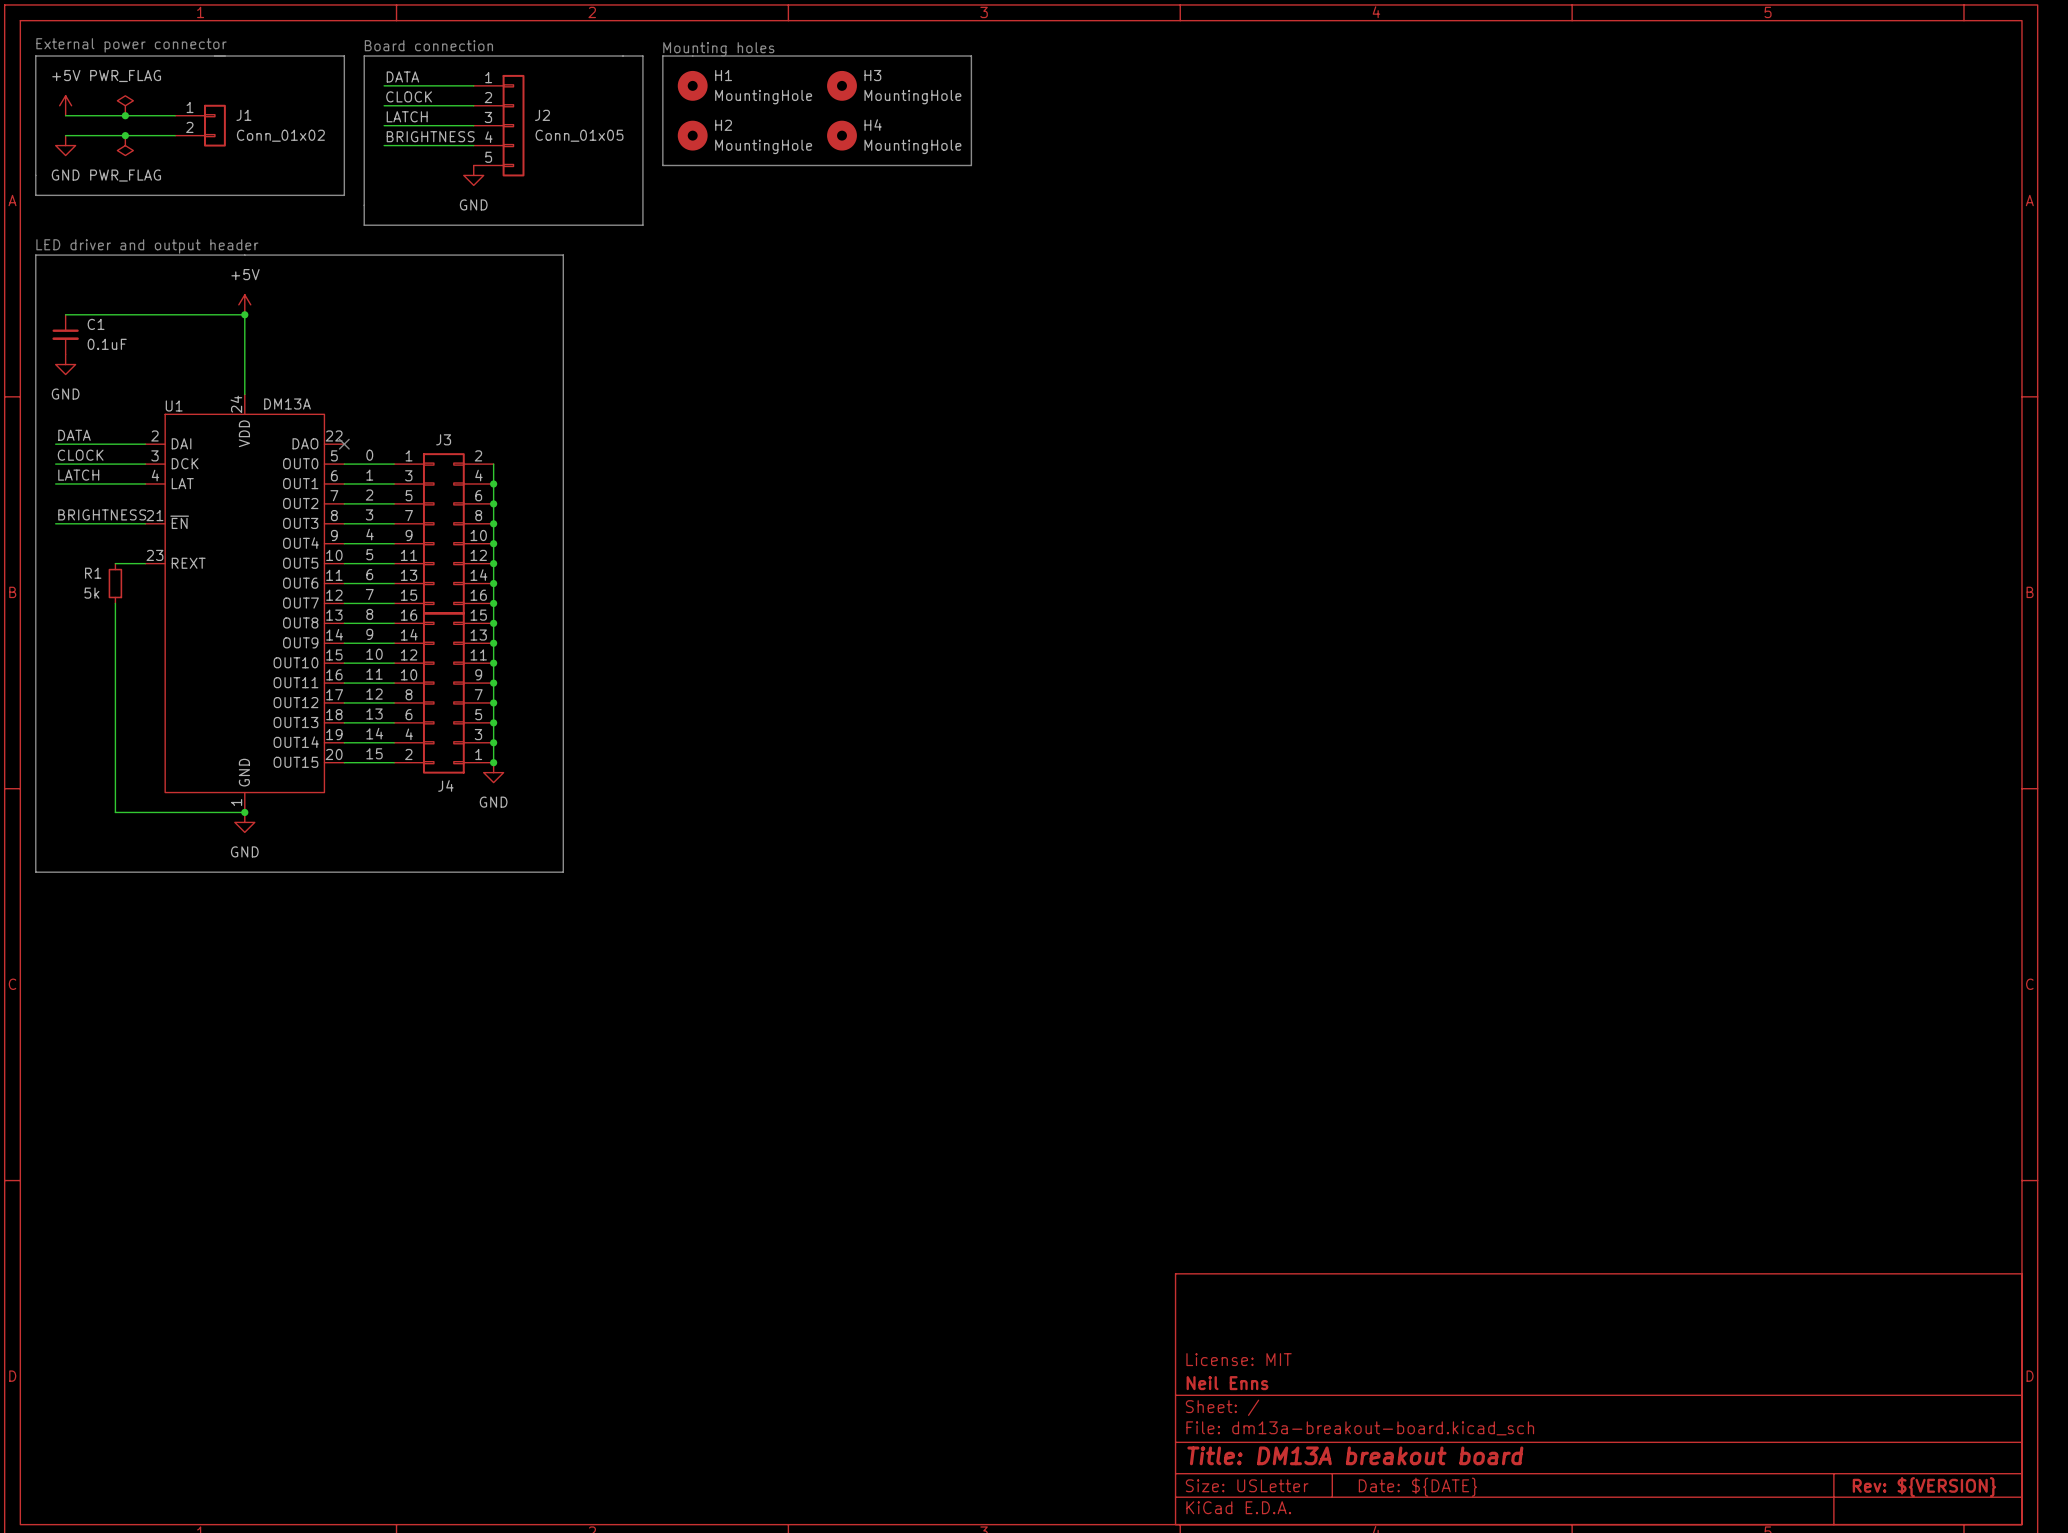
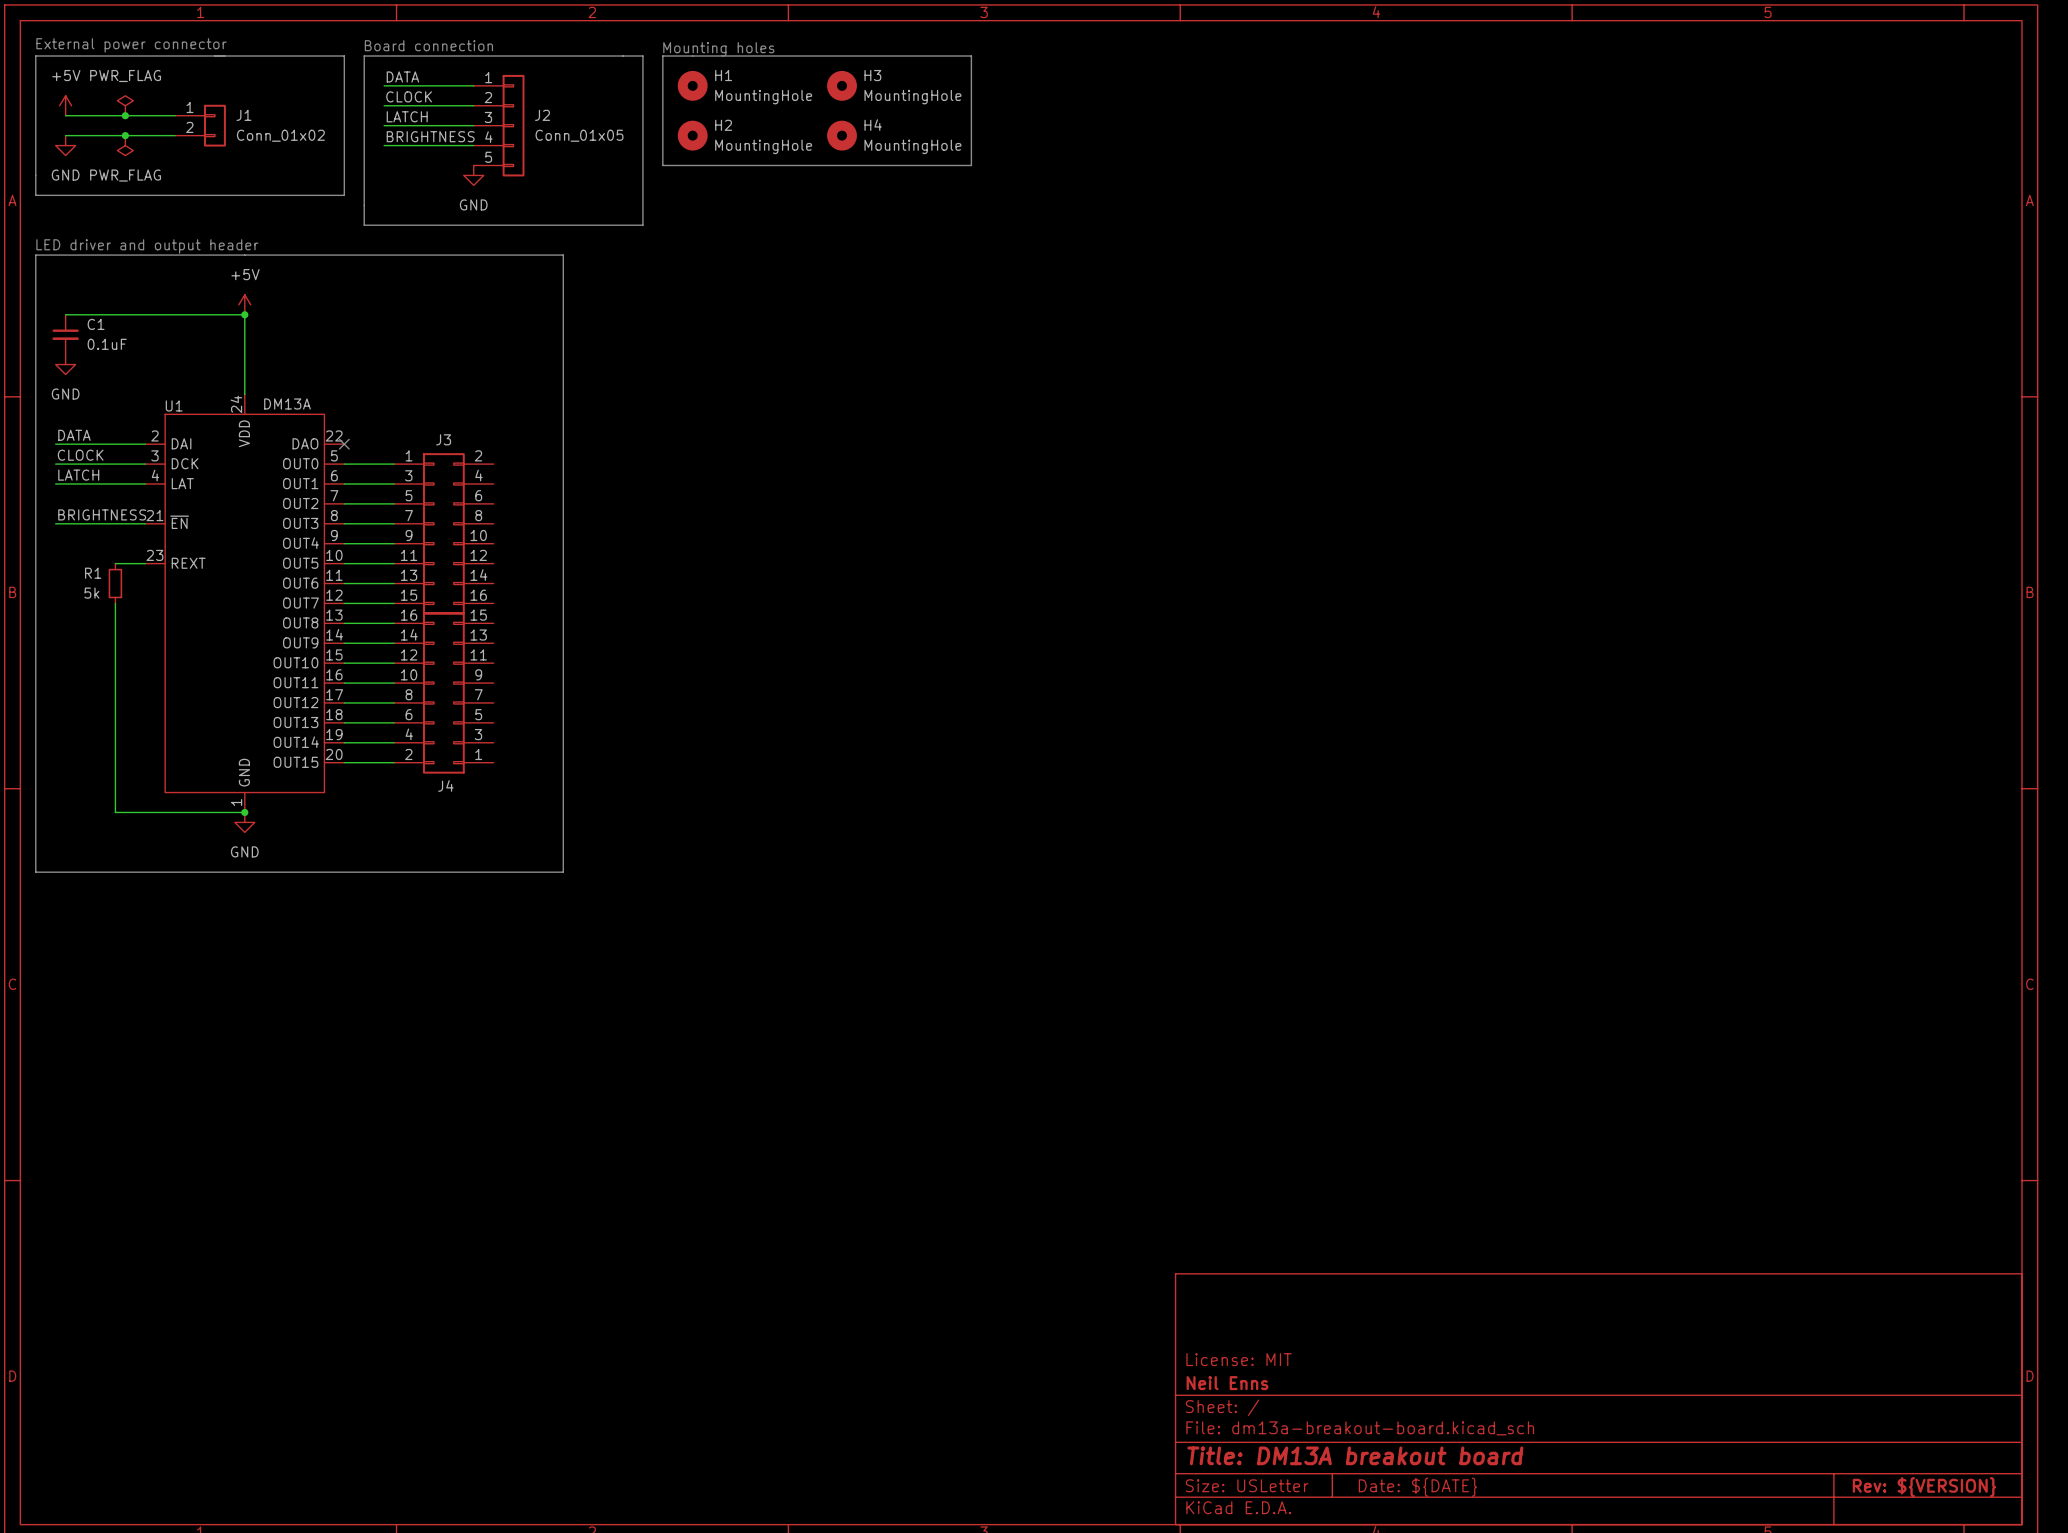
label: 0 (369, 455) -> none
wire: (493, 464) (493, 762) -> none
label: 1 (369, 475) -> none
junction: (493, 483) -> none
label: 2 (369, 495) -> none
junction: (493, 503) -> none
label: 3 (369, 514) -> none
junction: (493, 523) -> none
label: 4 (370, 534) -> none
junction: (493, 543) -> none
label: 5 (369, 554) -> none
junction: (493, 563) -> none
label: 6 (369, 574) -> none
junction: (493, 583) -> none
label: 7 (369, 594) -> none
junction: (493, 603) -> none
label: 8 (369, 614) -> none
junction: (493, 623) -> none
label: 9 (369, 634) -> none
junction: (493, 643) -> none
label: 10 (374, 654) -> none
junction: (493, 663) -> none
label: 11 (374, 674) -> none
junction: (493, 683) -> none
label: 12 (374, 694) -> none
junction: (493, 702) -> none
label: 13 (374, 713) -> none
junction: (493, 722) -> none
label: 14 (374, 733) -> none
junction: (493, 742) -> none
label: 15 (374, 753) -> none
junction: (493, 762) -> none
power symbol: GND (493, 772) -> none

